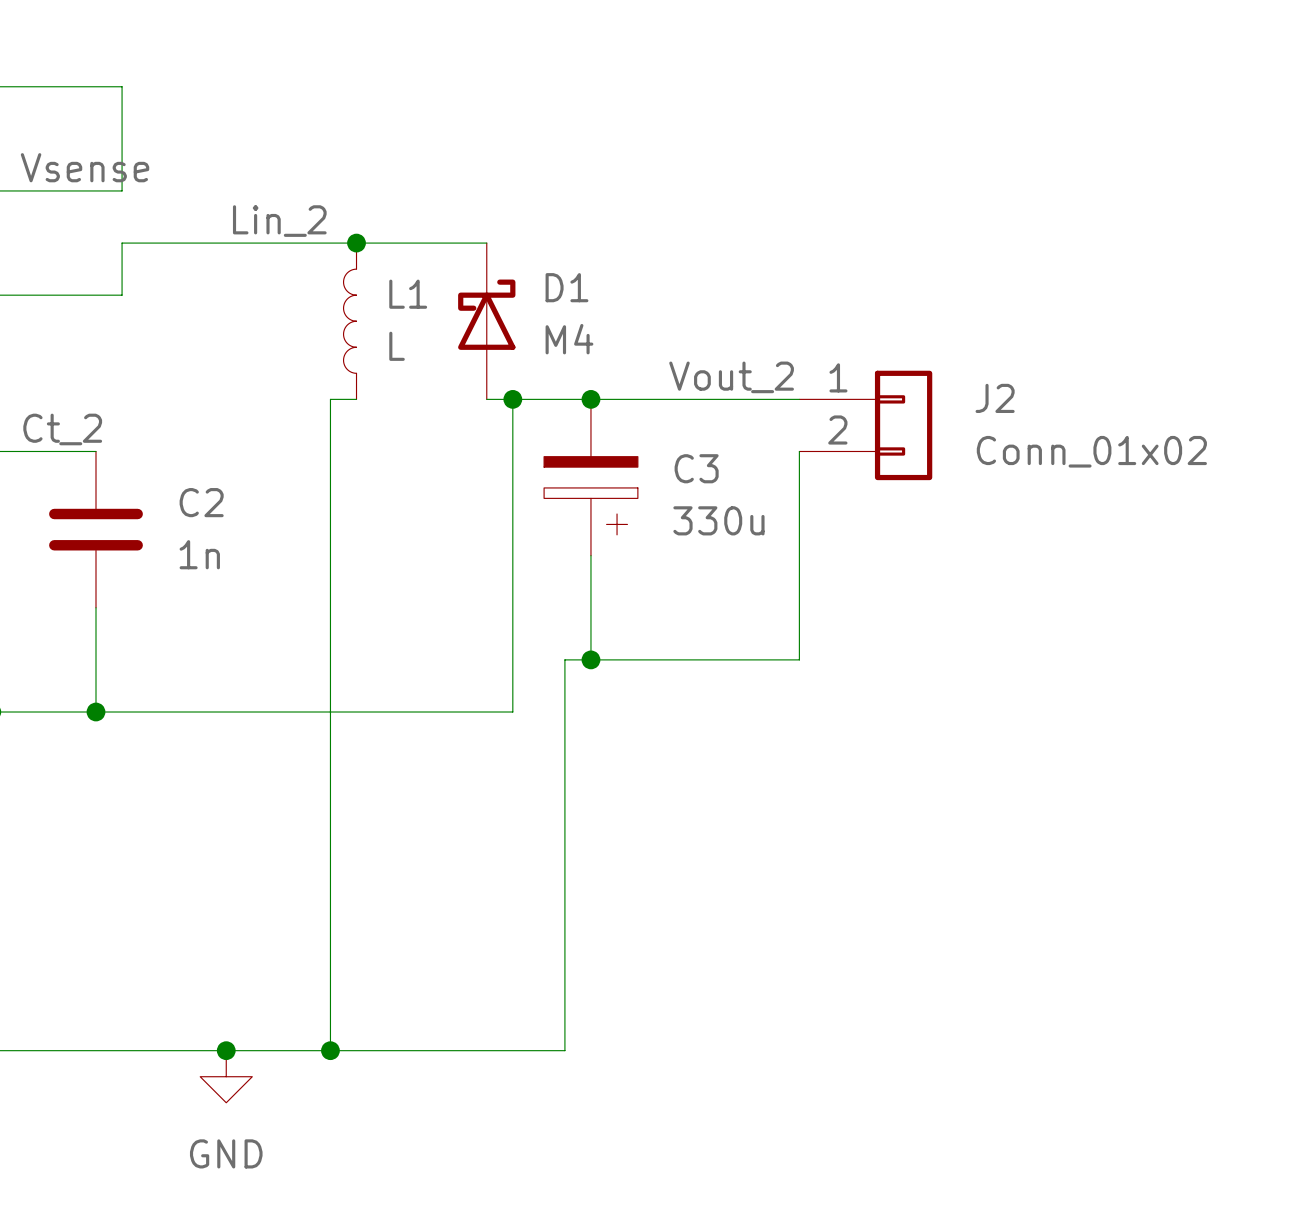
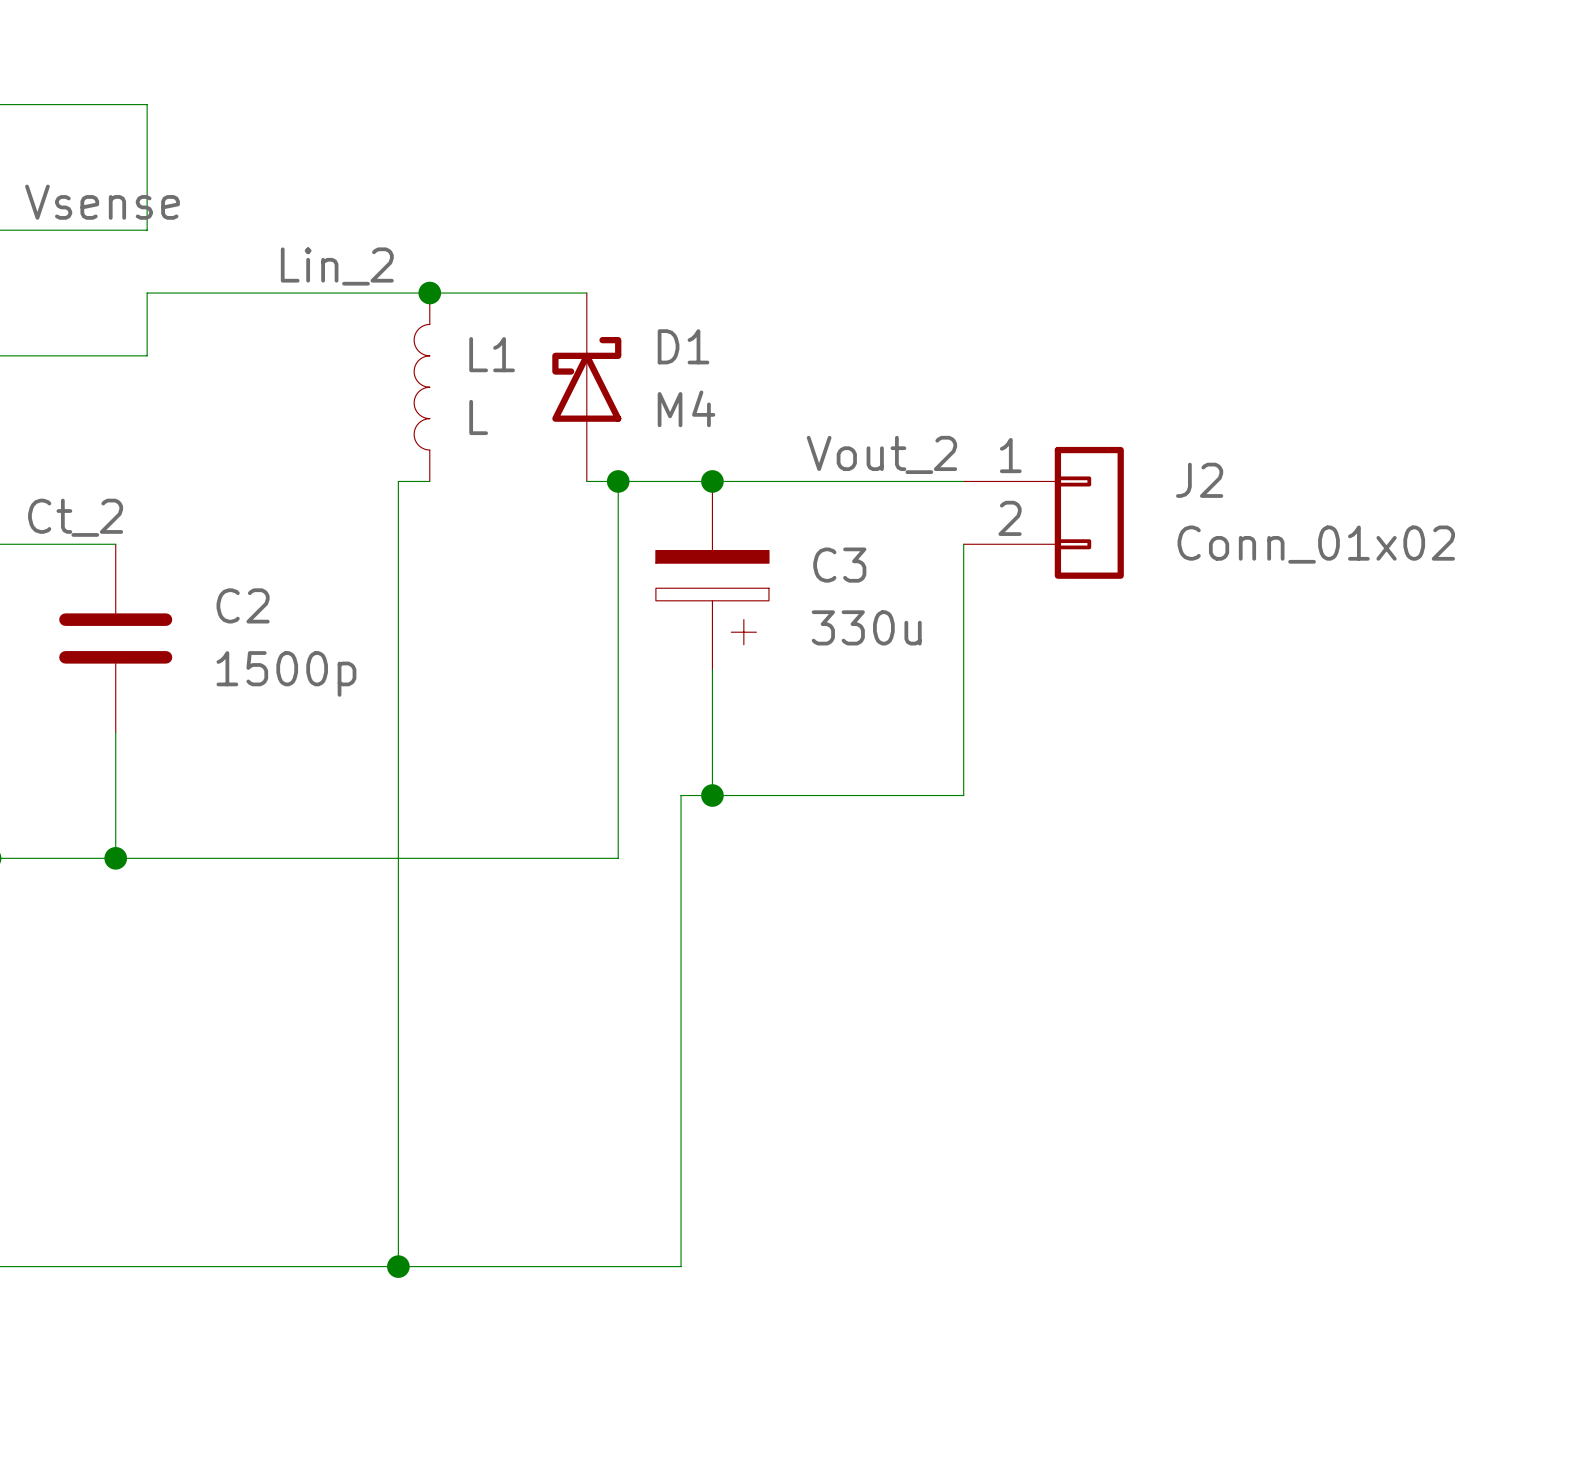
C2 value: 1n (199, 554) -> 1500p (286, 673)
junction: (226, 1050) -> none
power symbol: GND (226, 1076) -> none

